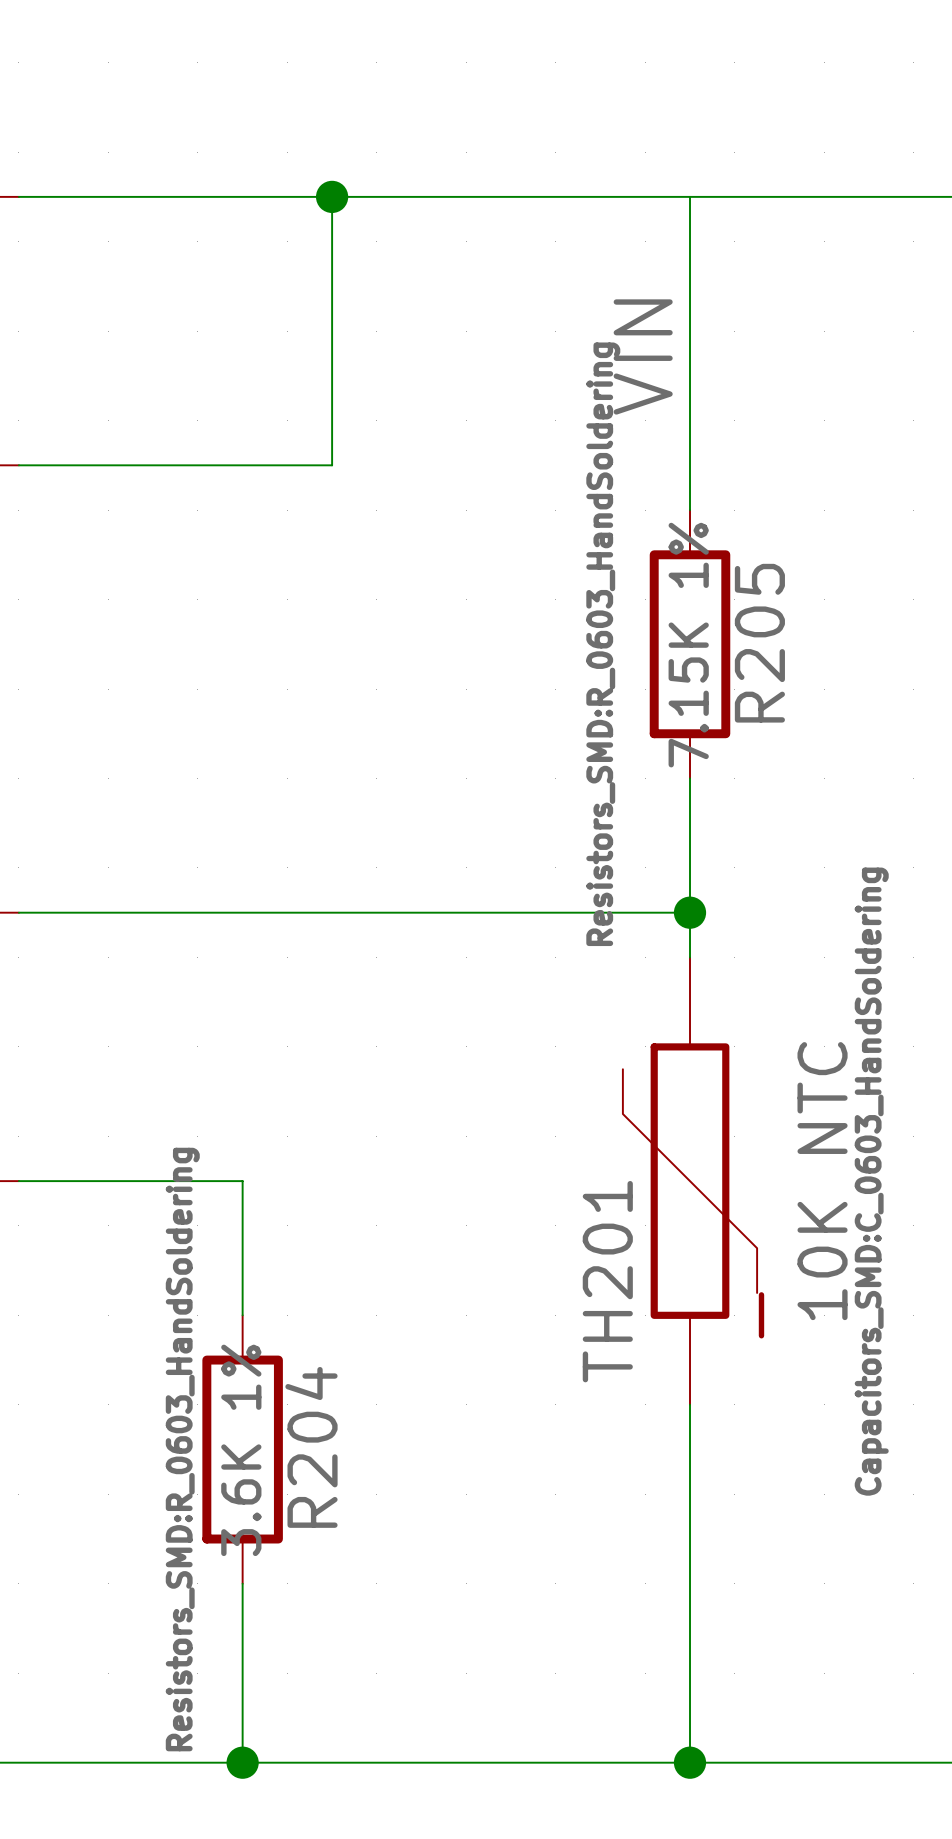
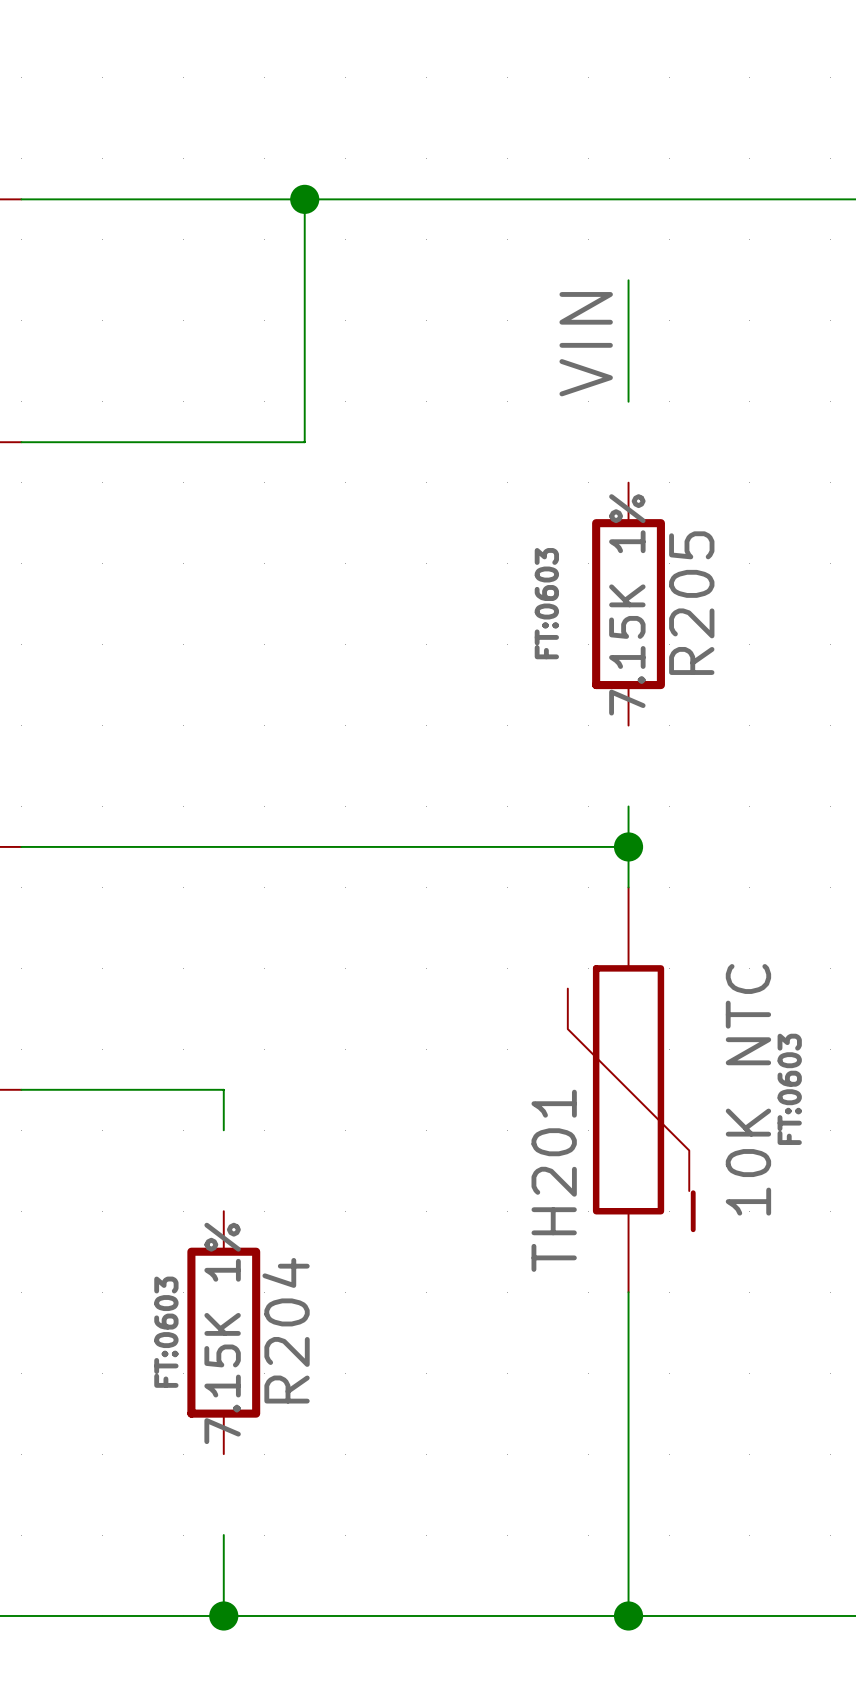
wire: (690, 196) (690, 286) -> none
wire: (690, 420) (690, 510) -> none
R205 text: Resistors_SMD:R_0603_HandSoldering (603, 644) -> FT:0603 (546, 603)
wire: (690, 778) (690, 867) -> none
TH201 text: Capacitors_SMD:C_0603_HandSoldering (871, 1181) -> FT:0603 (789, 1089)
wire: (242, 1225) (242, 1315) -> none
R204 text: Resistors_SMD:R_0603_HandSoldering (182, 1449) -> FT:0603 (166, 1332)
R204 value: 3.6K 1% (241, 1450) -> 7.15K 1% (222, 1333)
wire: (242, 1583) (242, 1673) -> none

